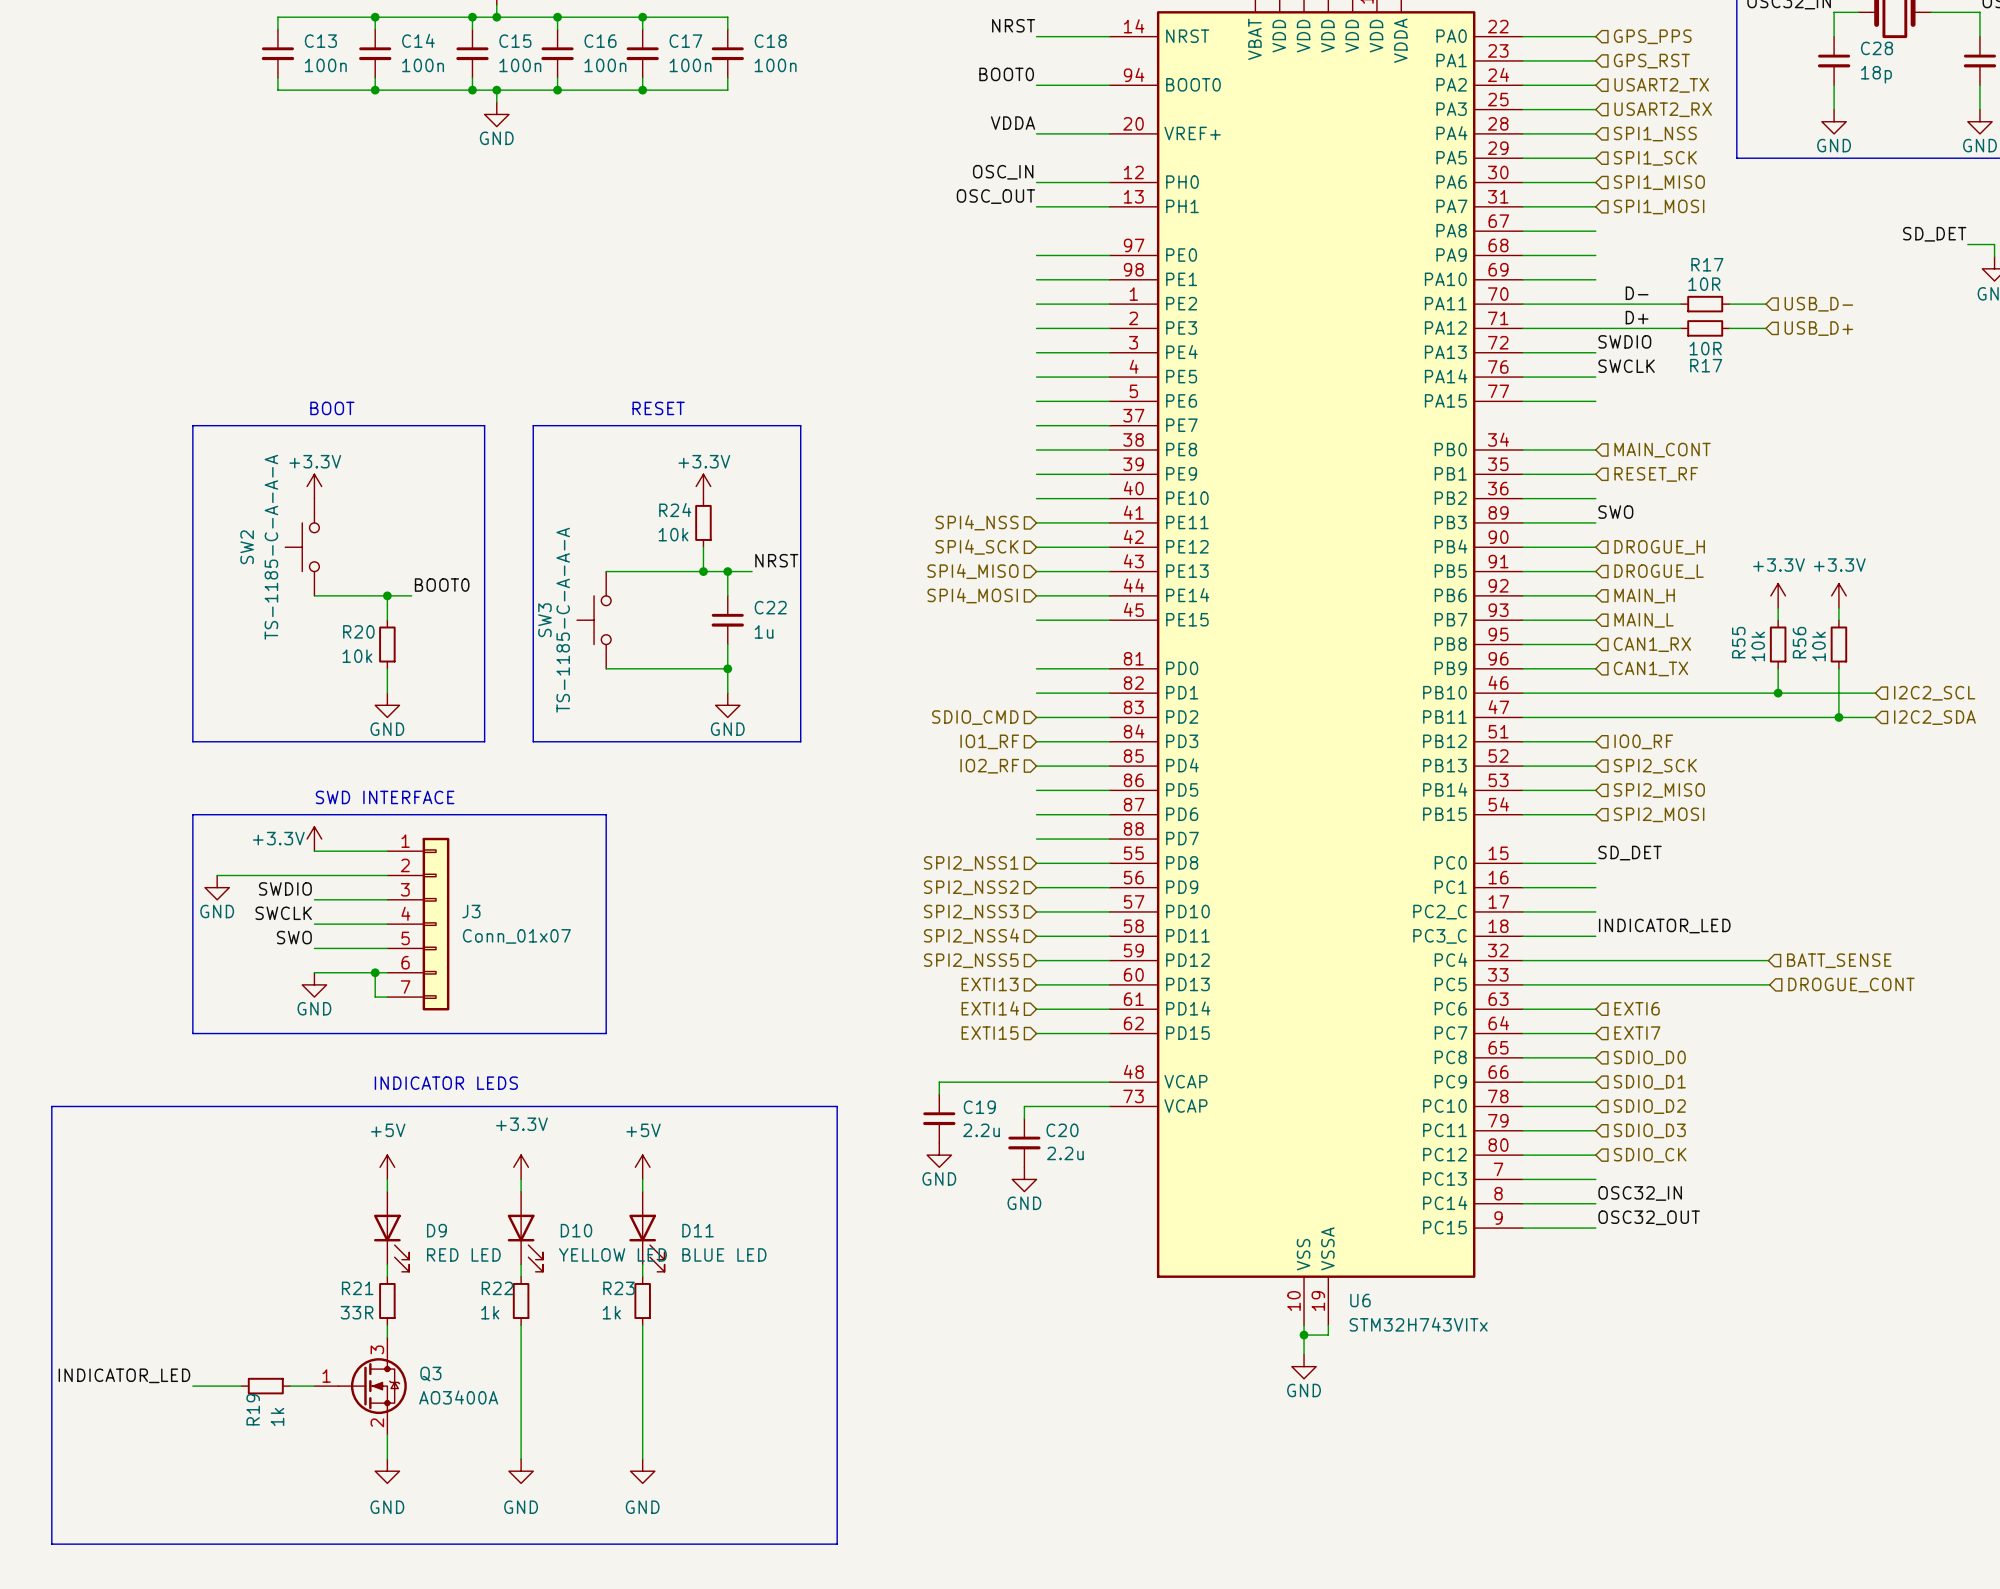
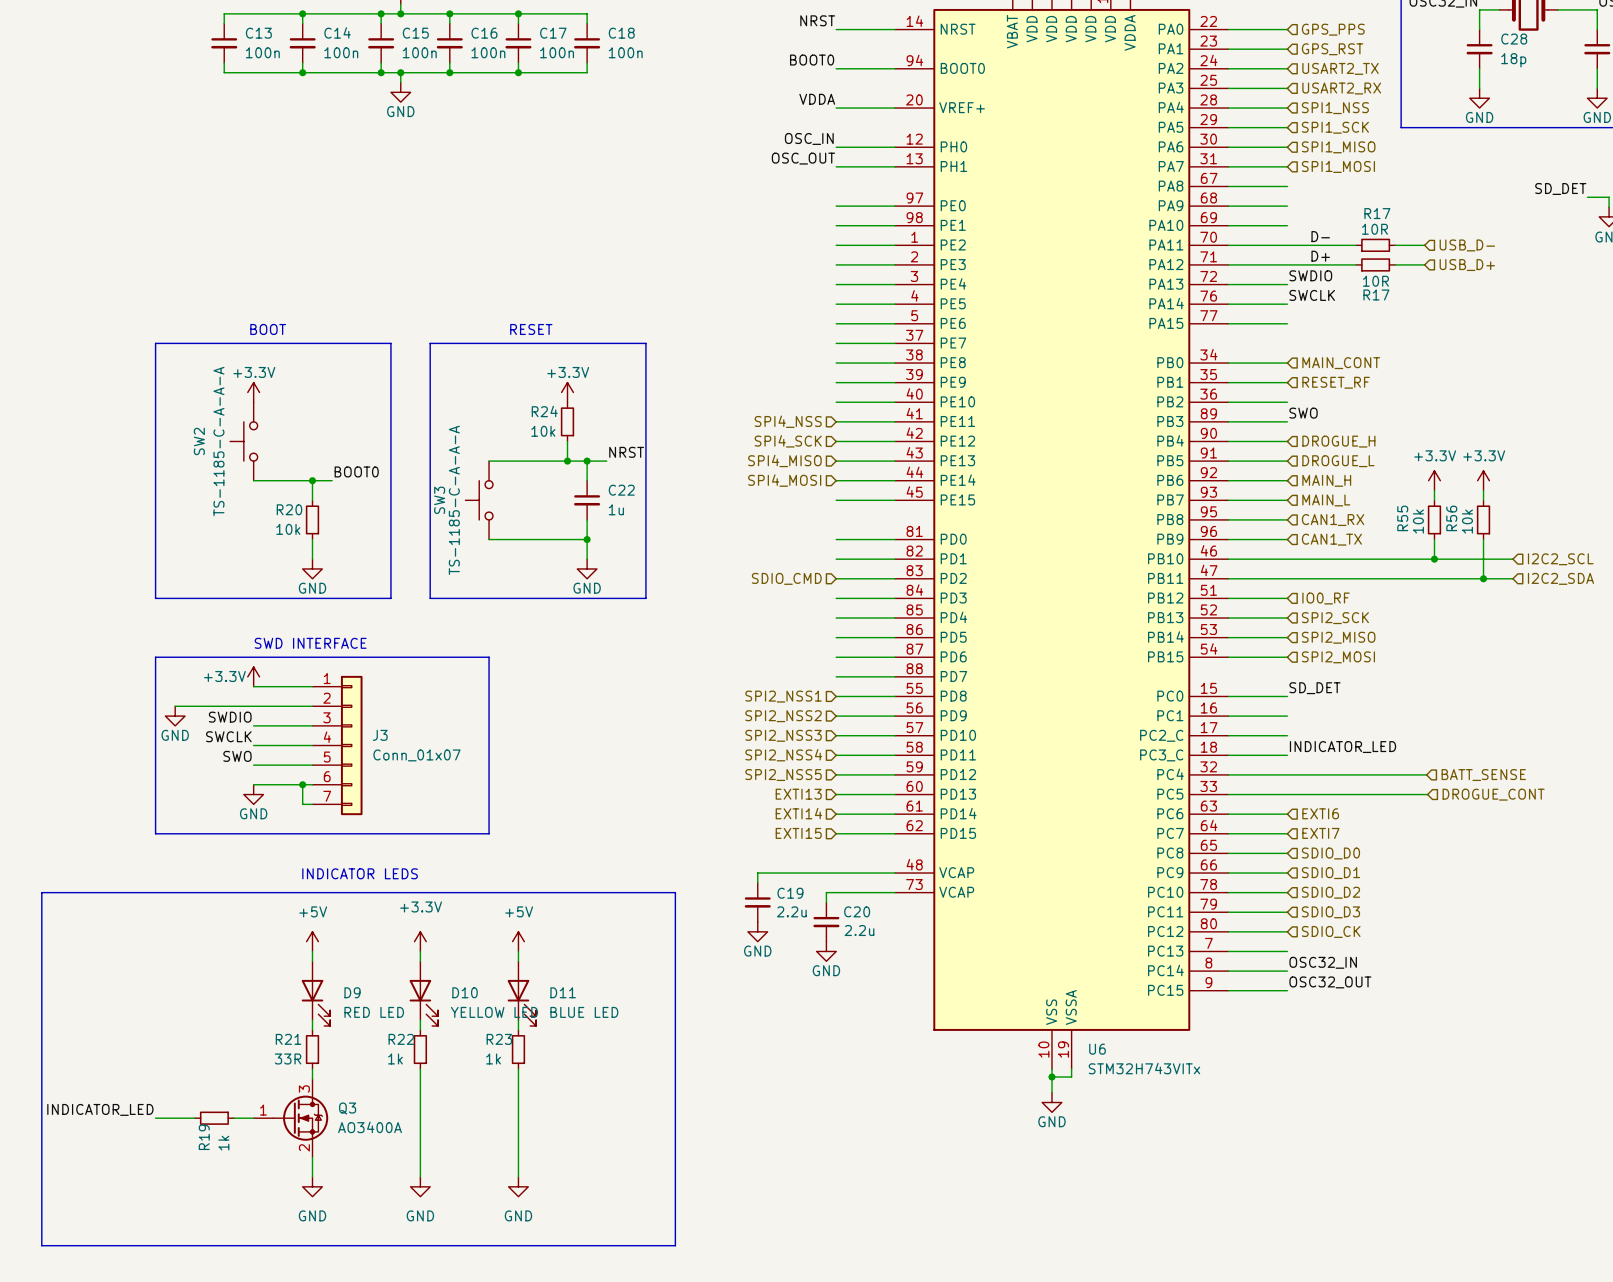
hierarchical label: IO1_RF (989, 741) -> none
hierarchical label: IO2_RF (989, 766) -> none

